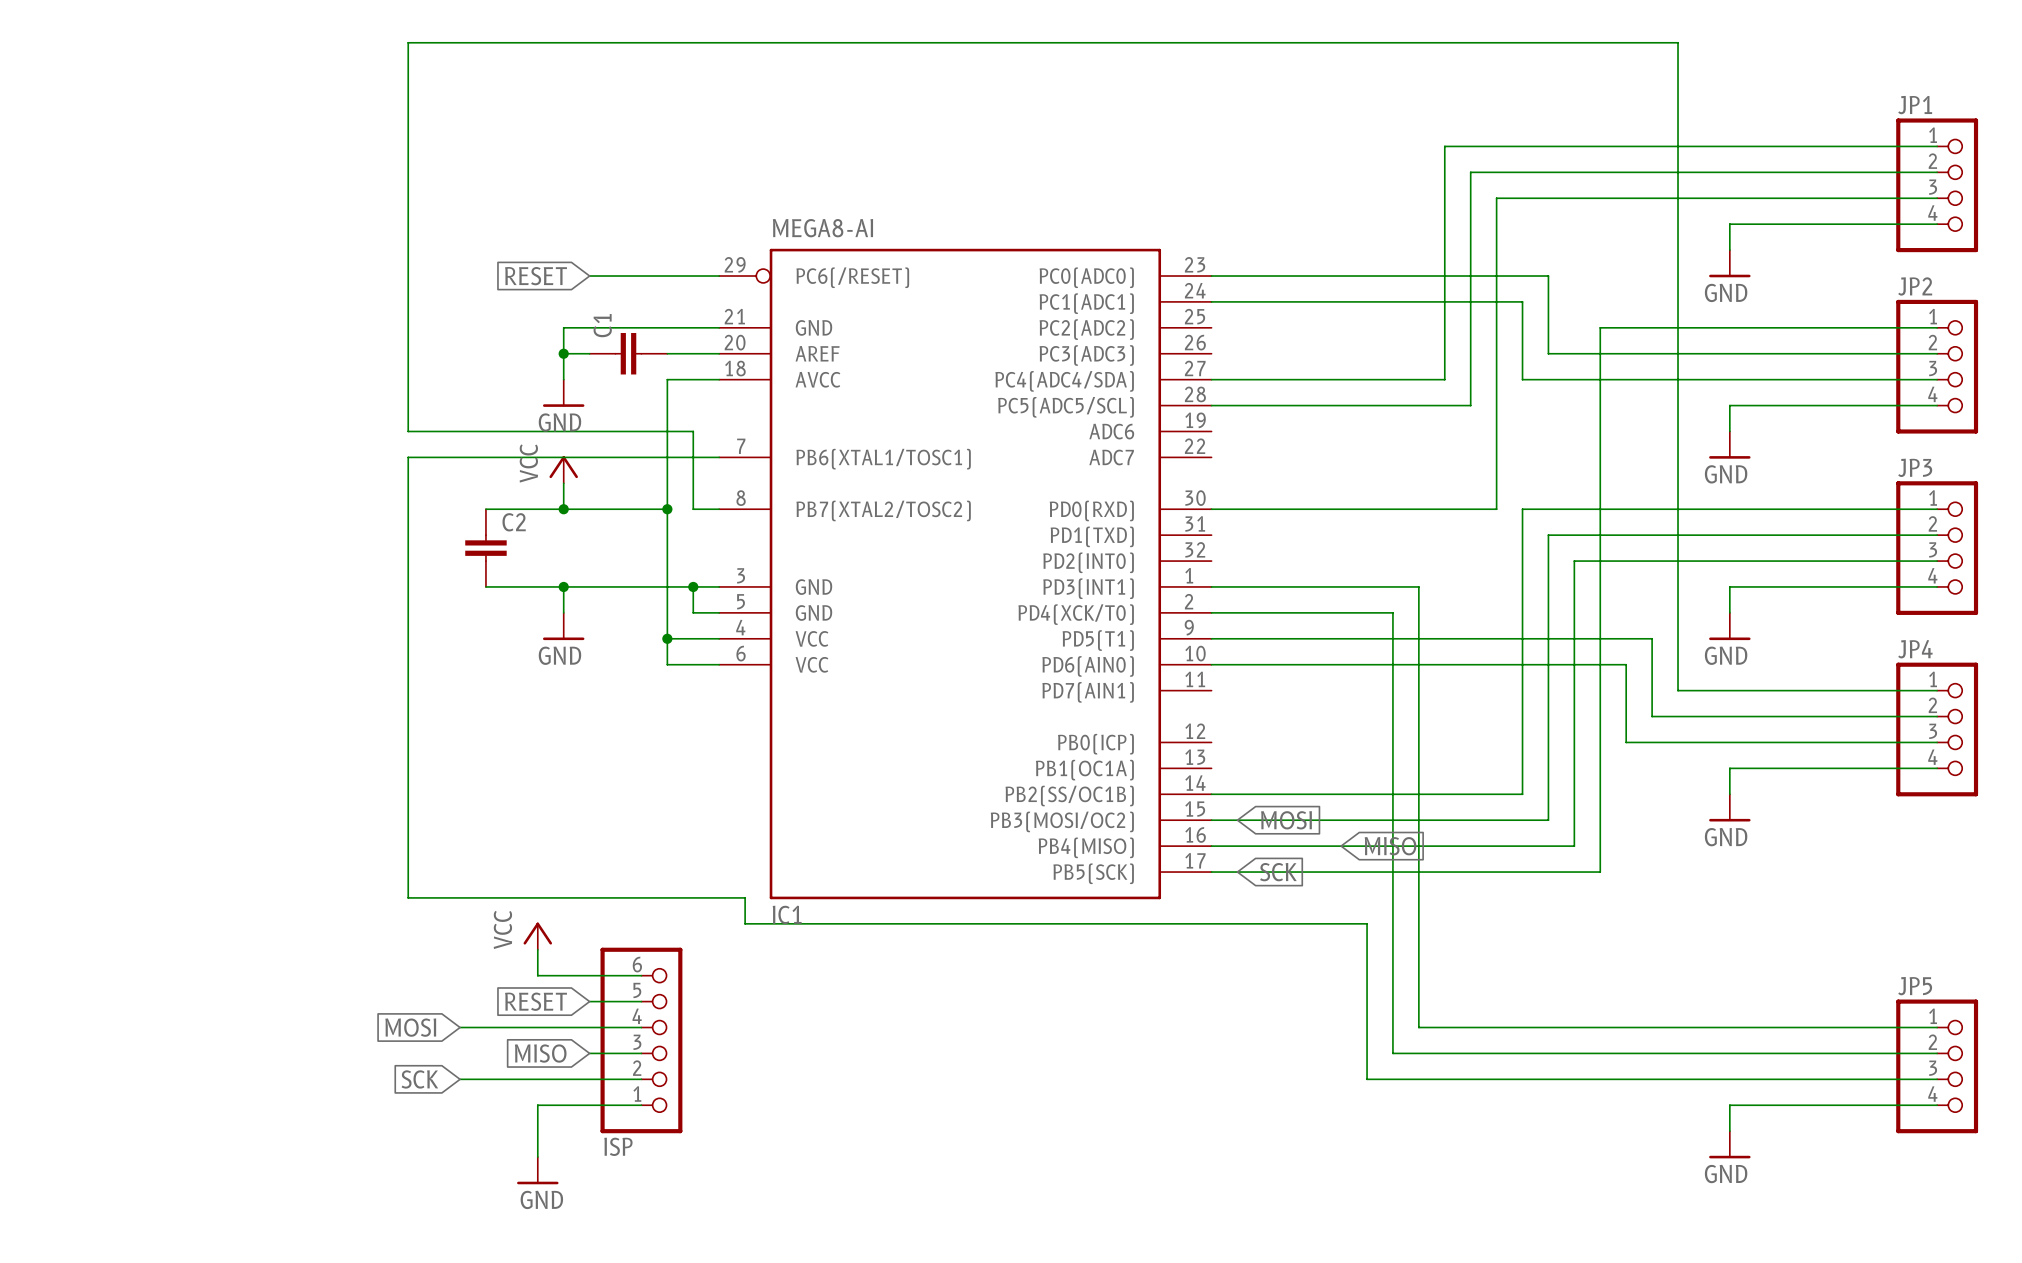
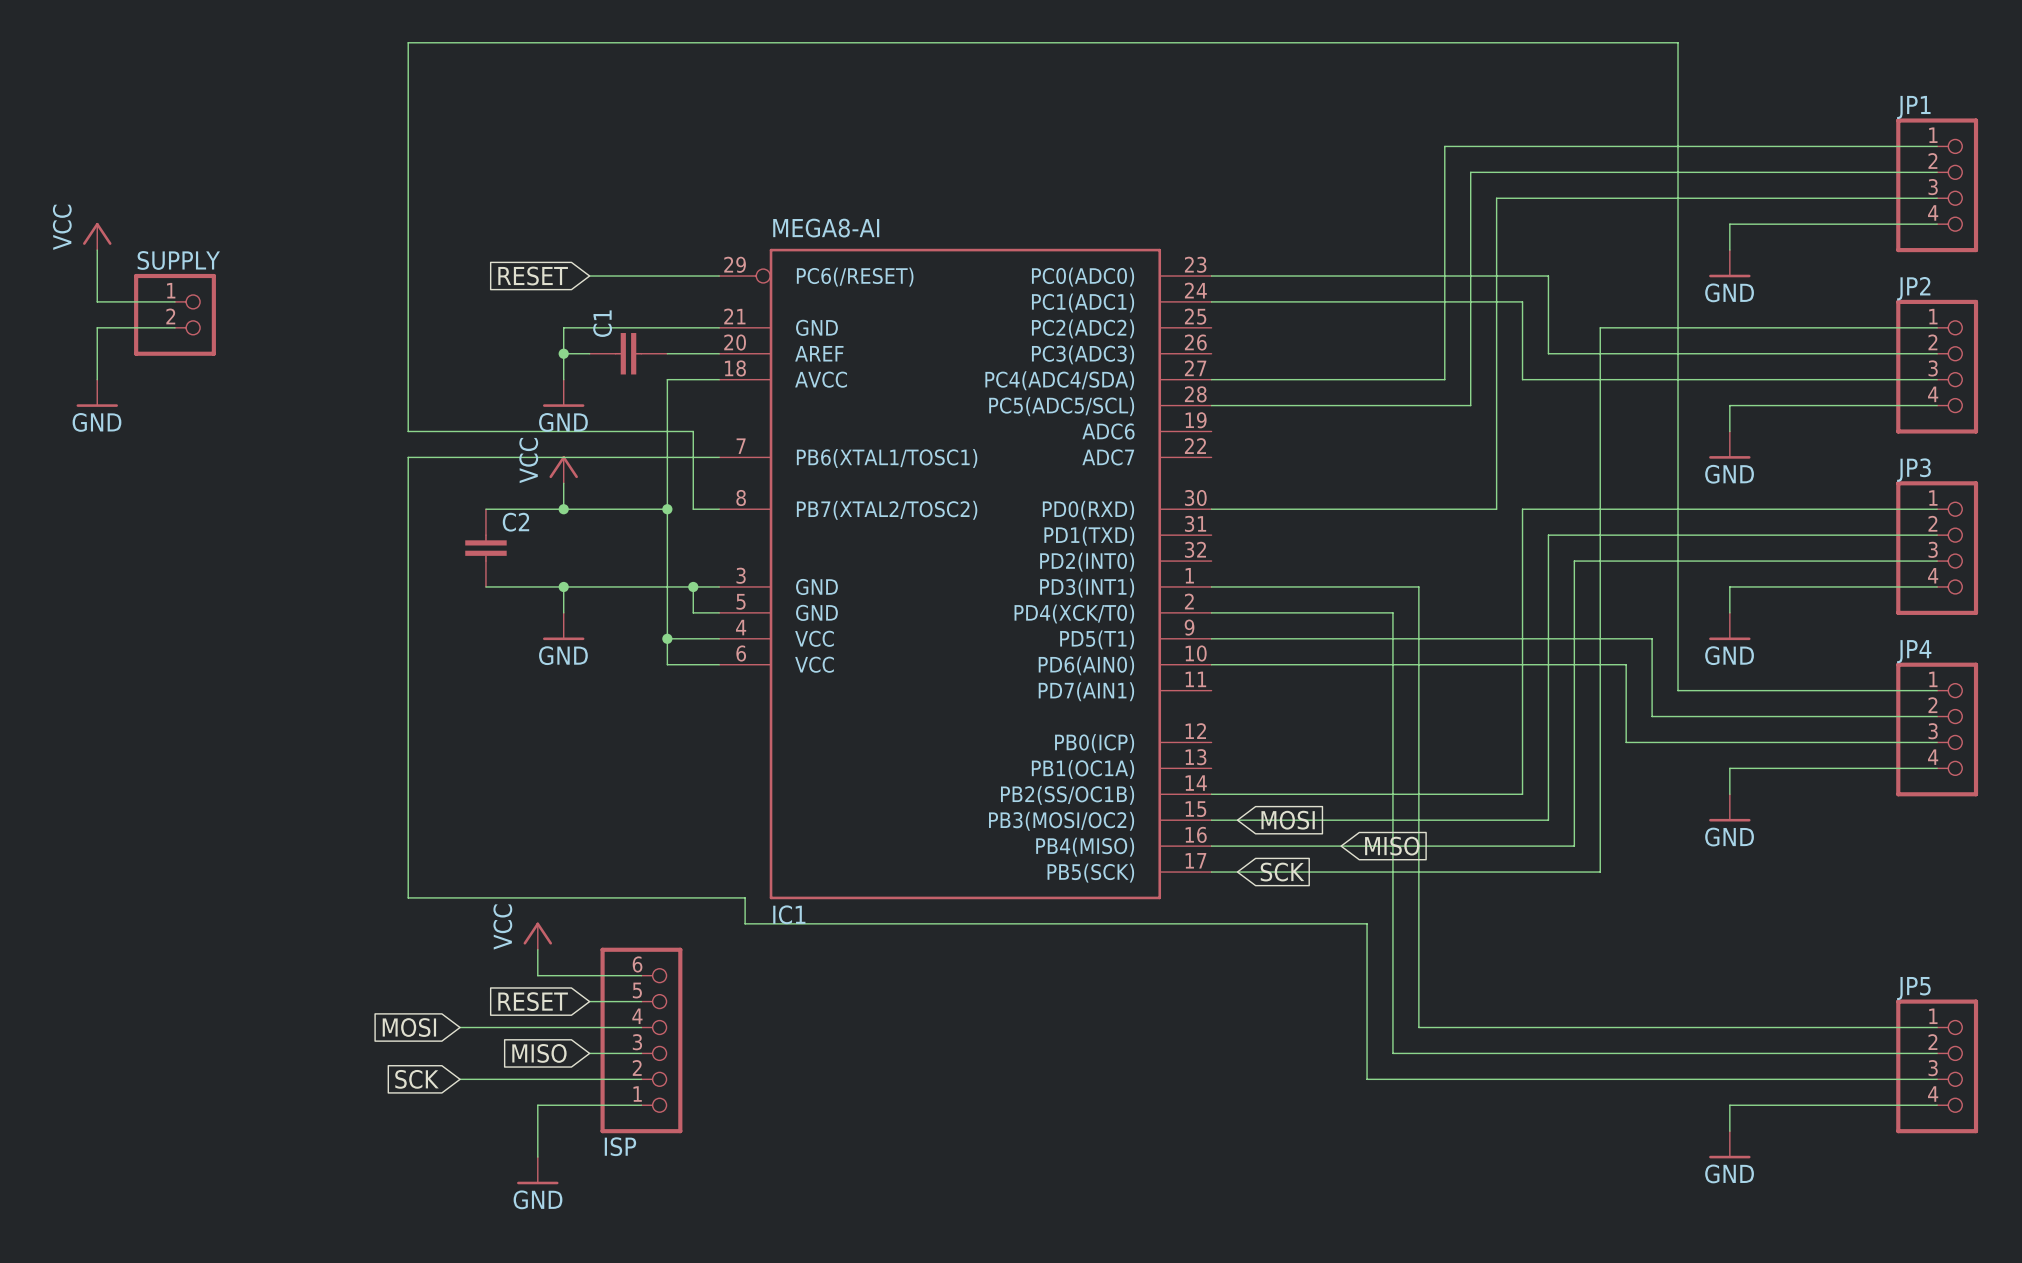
power symbol: none -> VCC (97, 236)
wire: none -> (97, 250) (97, 301) (175, 301)
SUPPLY: none -> (175, 314)
wire: none -> (175, 327) (97, 327) (97, 379)
power symbol: none -> GND (97, 393)

